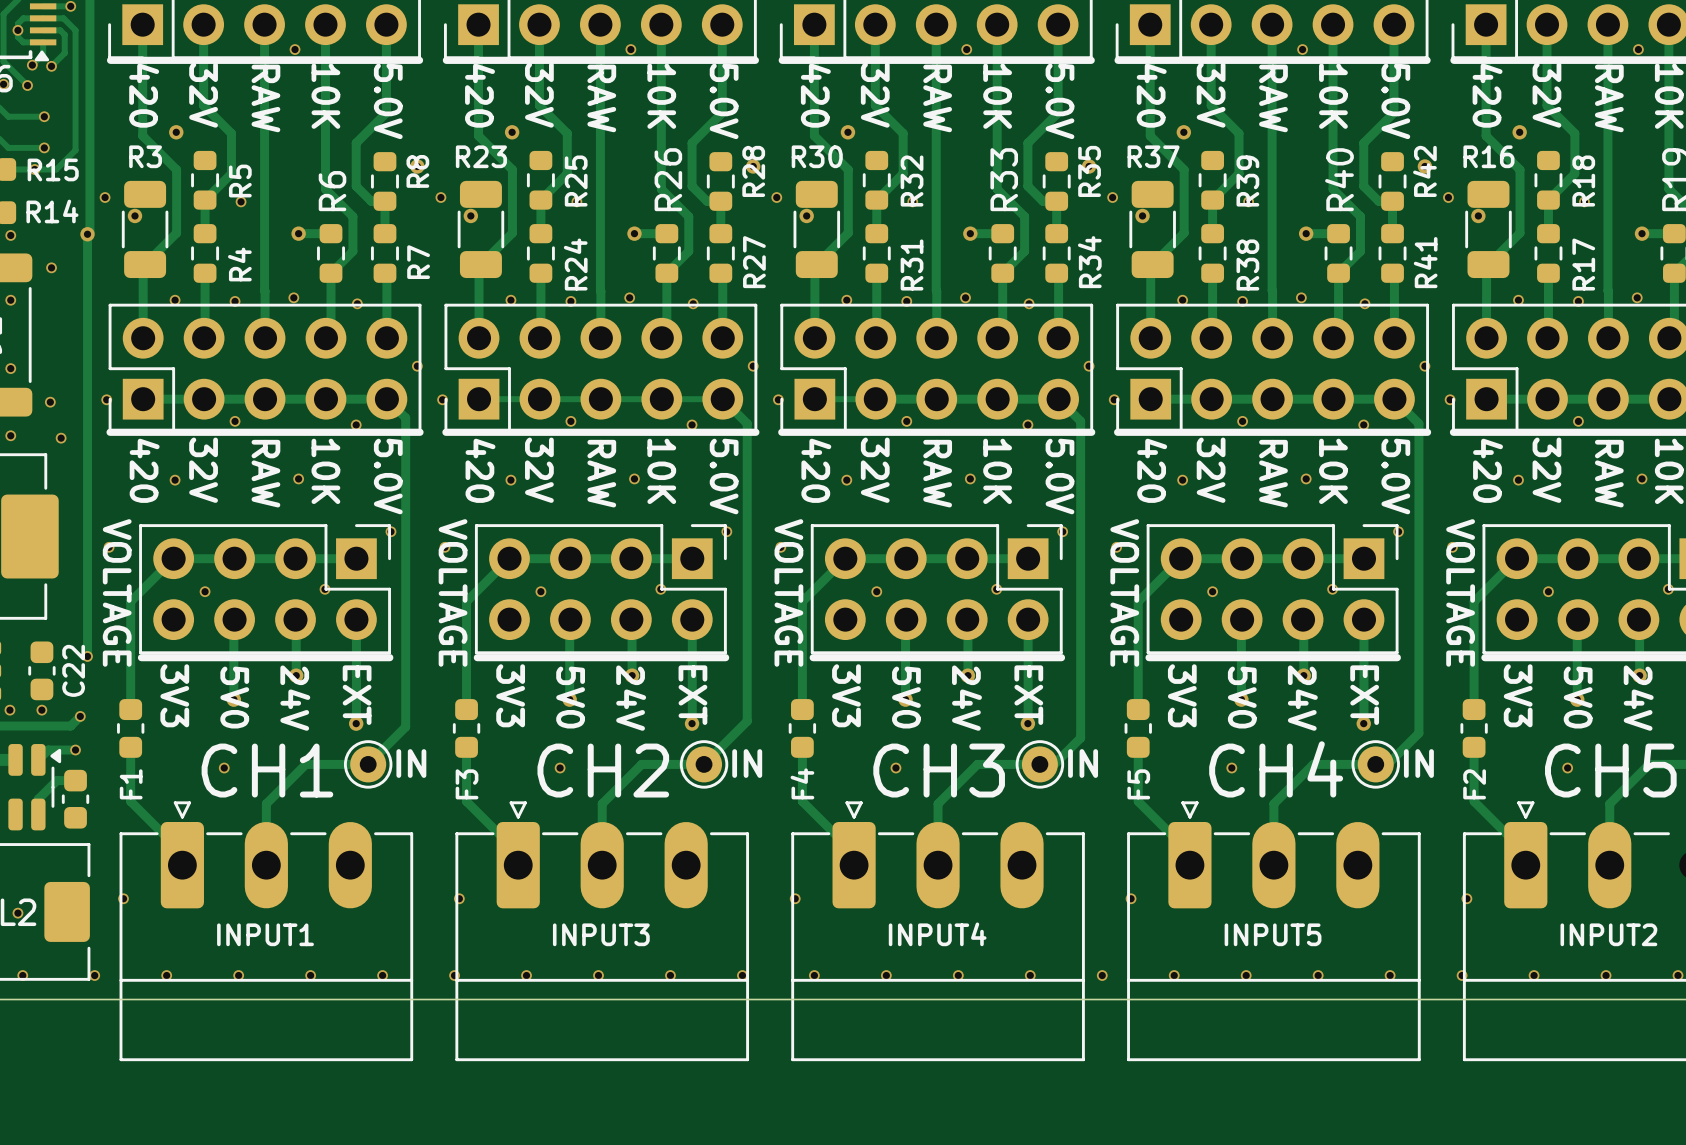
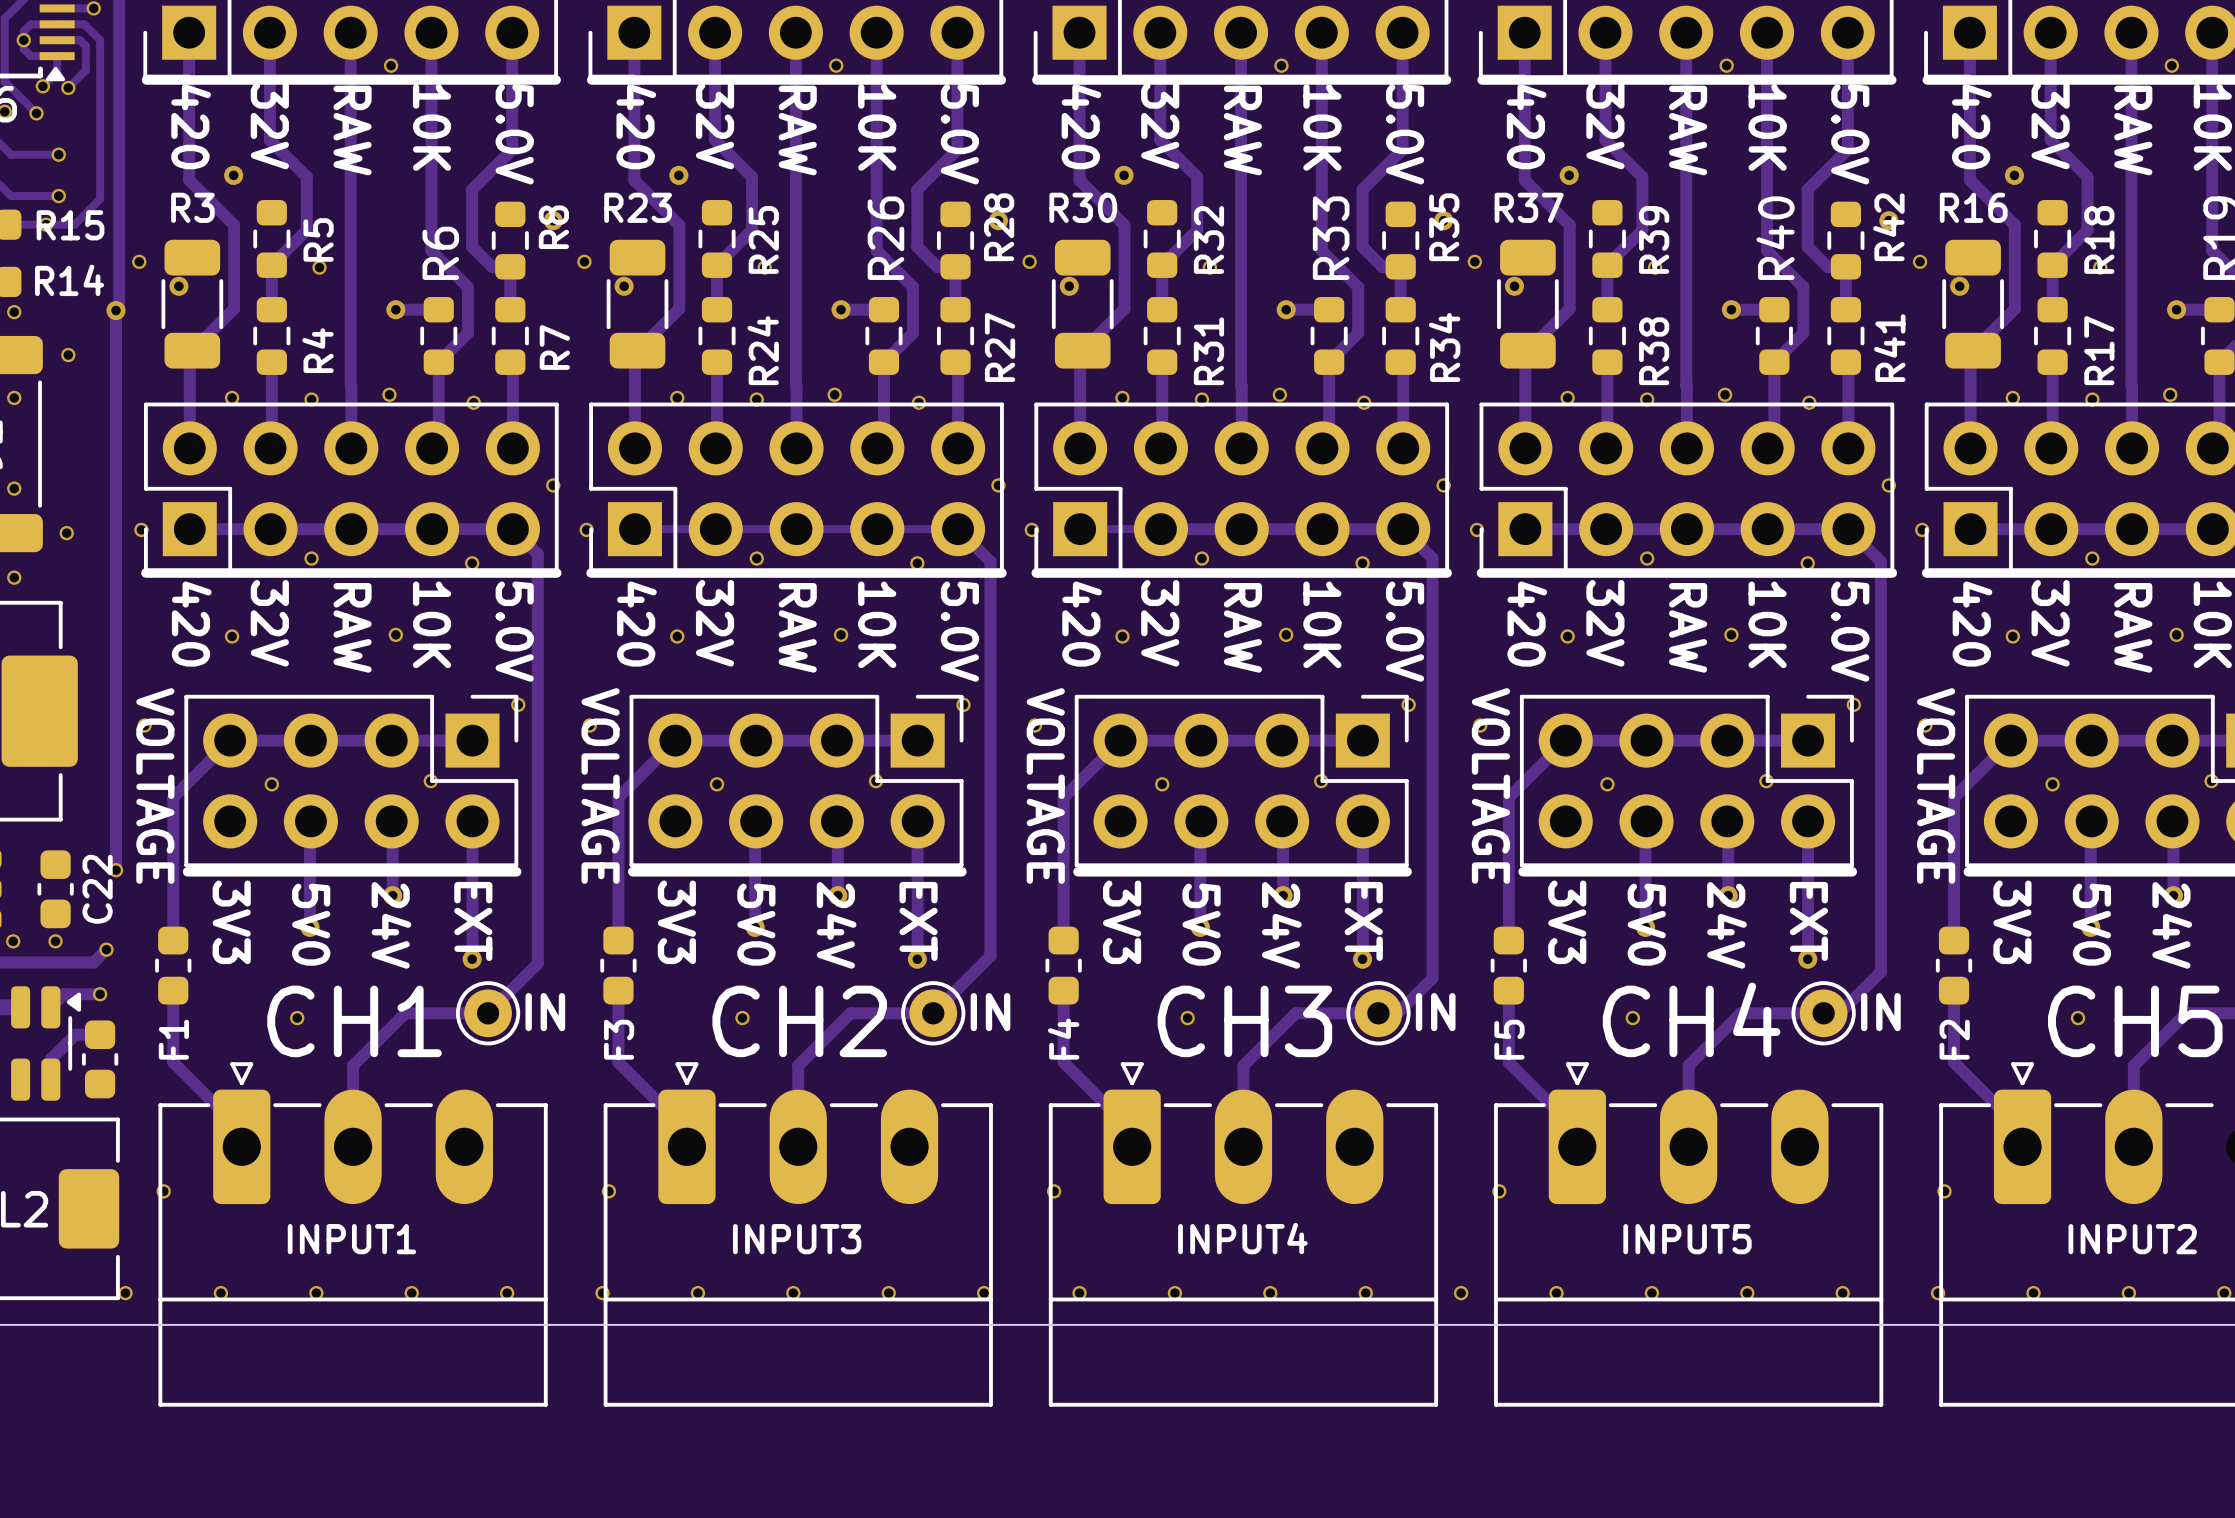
via: (61, 438) -> none
via: (17, 913) -> none
via: (22, 975) -> none

